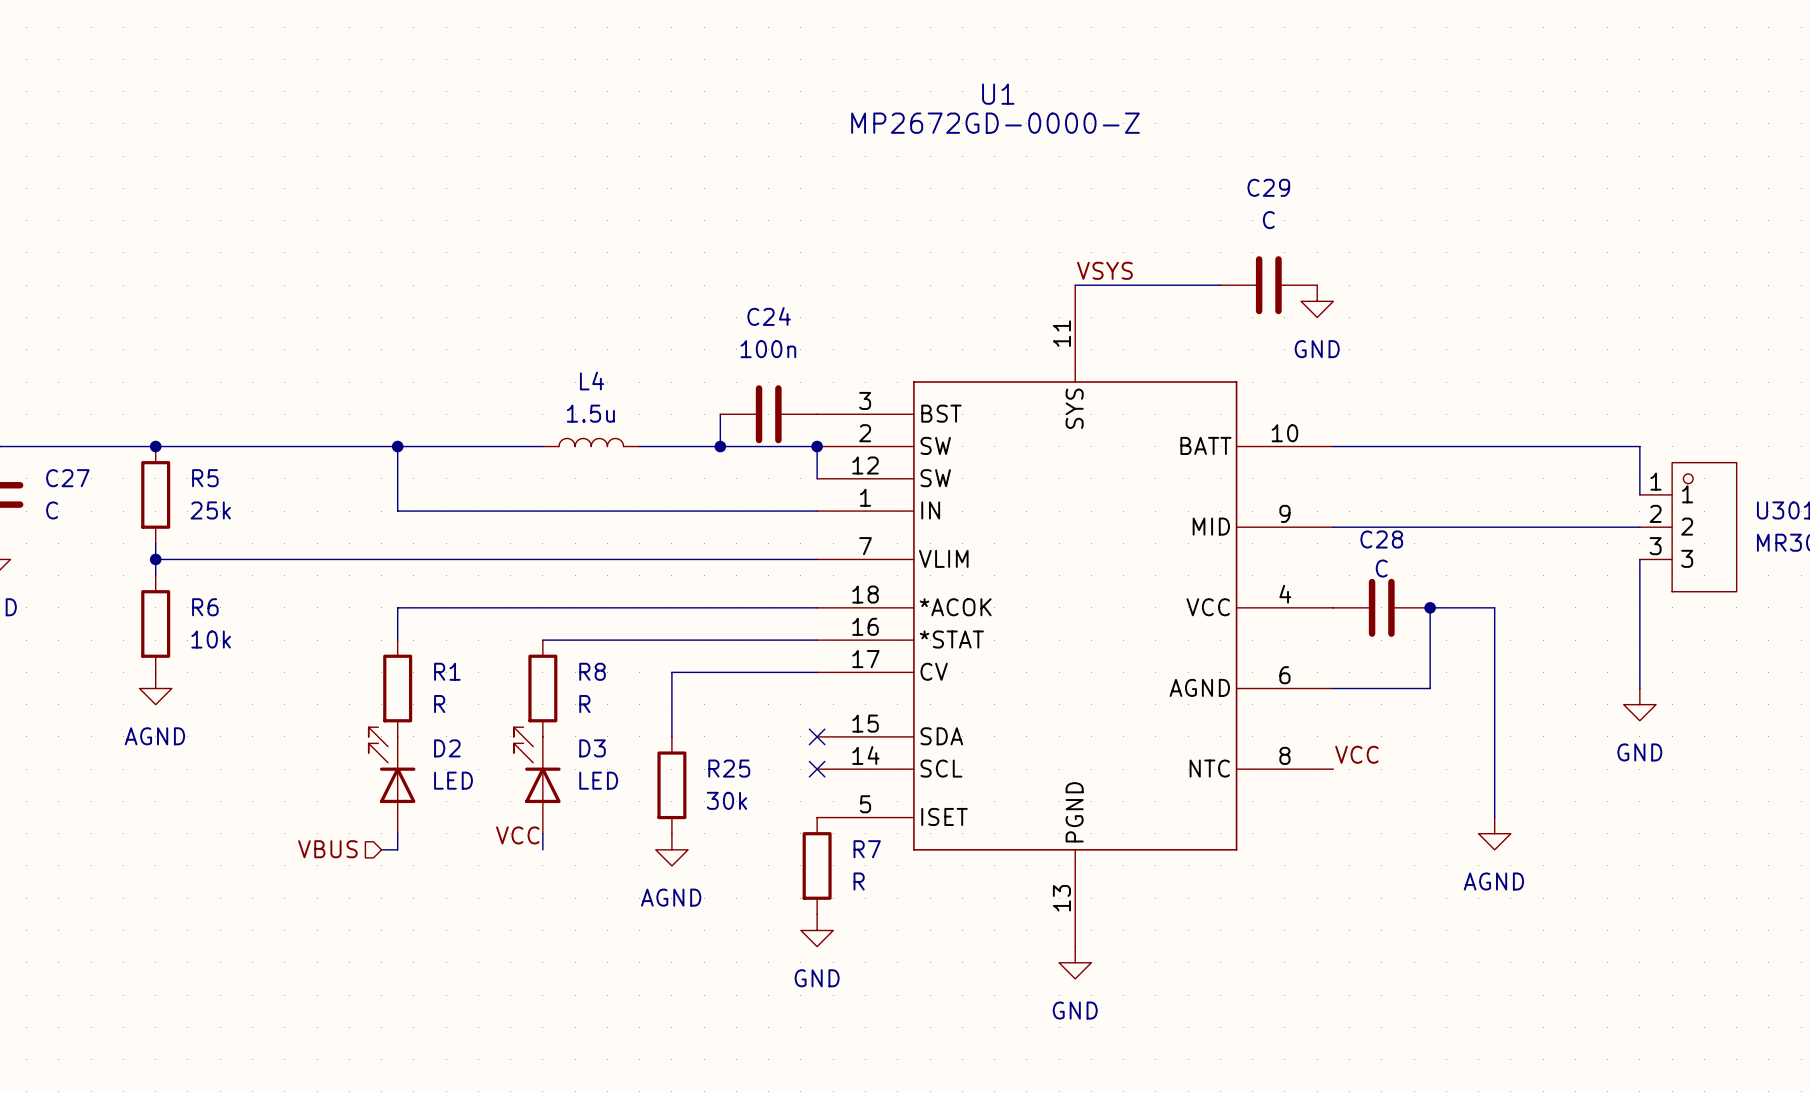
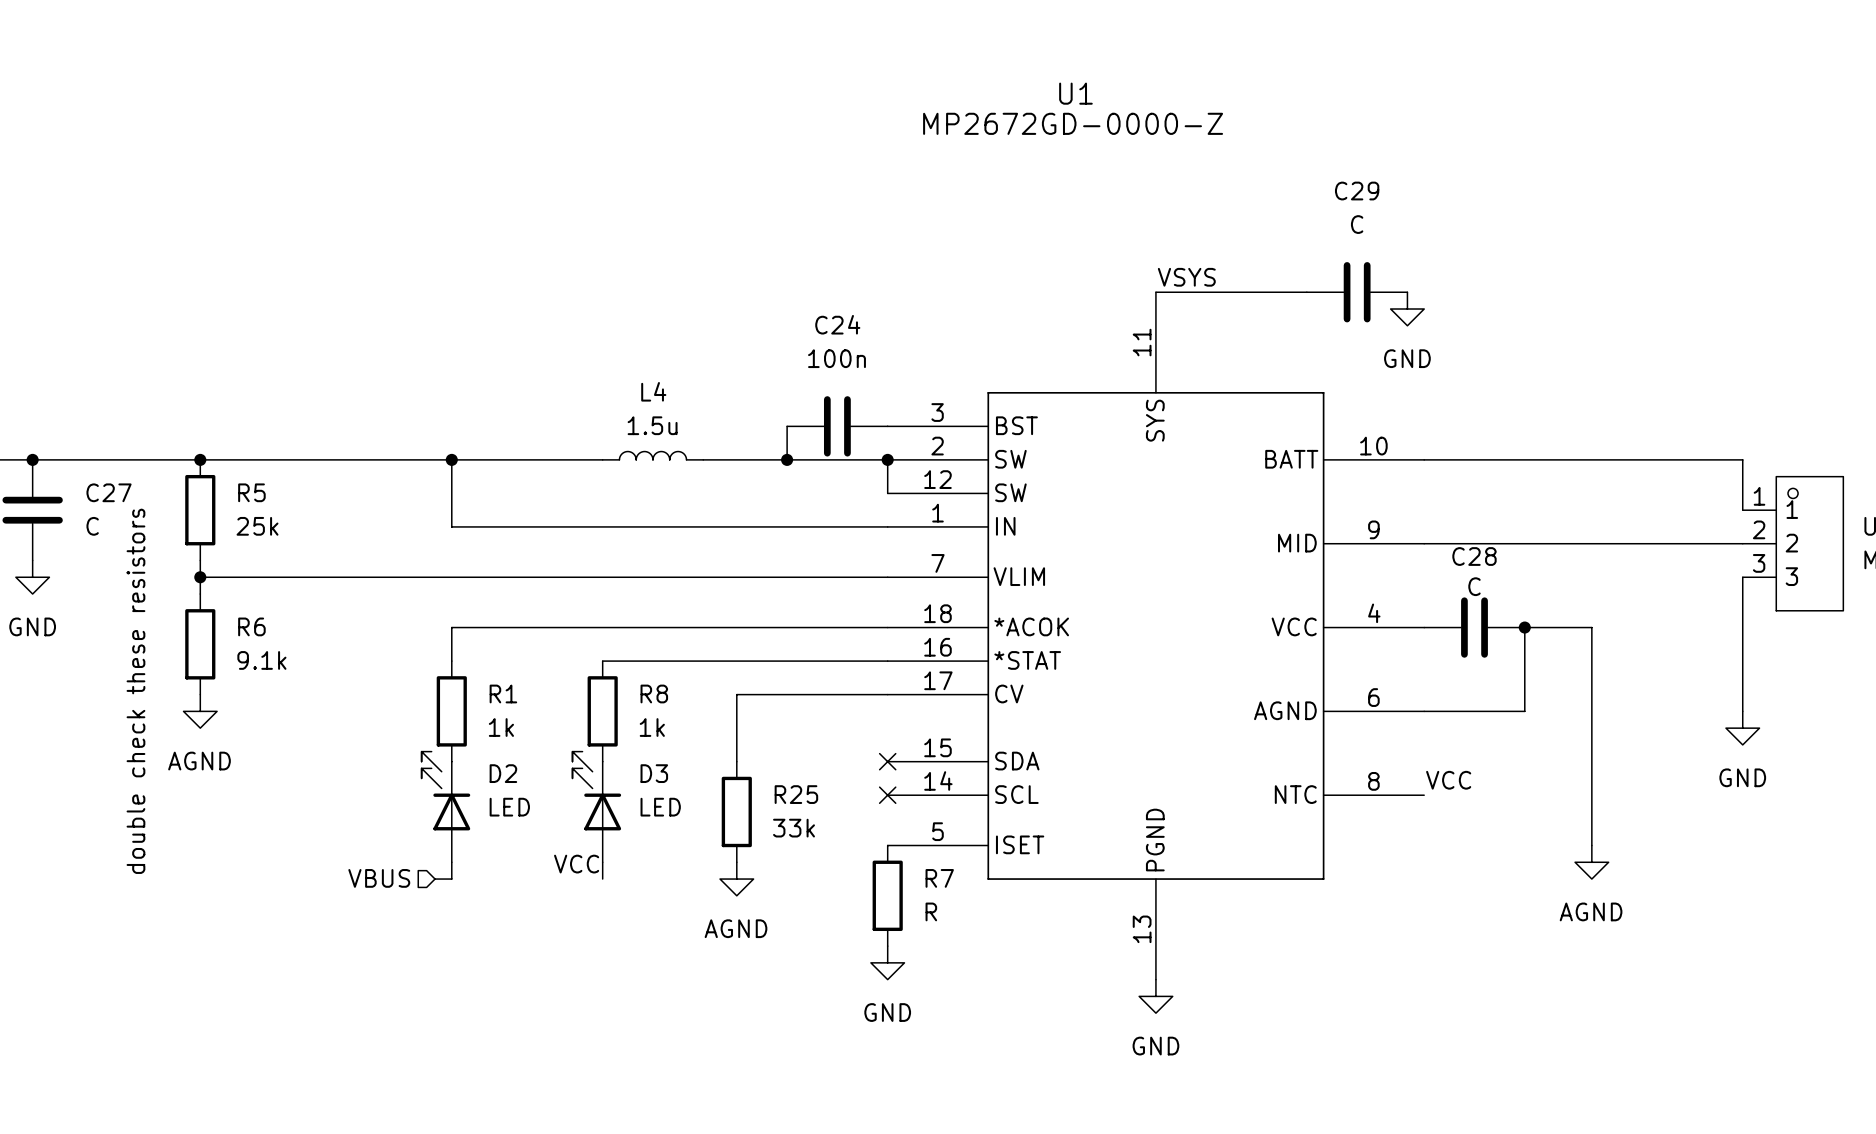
R6 value: 10k (211, 639) -> 9.1k (261, 660)
text: none -> double check these resistors (135, 691)
R1 value: R (439, 704) -> 1k (501, 727)
R8 value: R (584, 704) -> 1k (652, 727)
R25 value: 30k (726, 800) -> 33k (794, 828)

